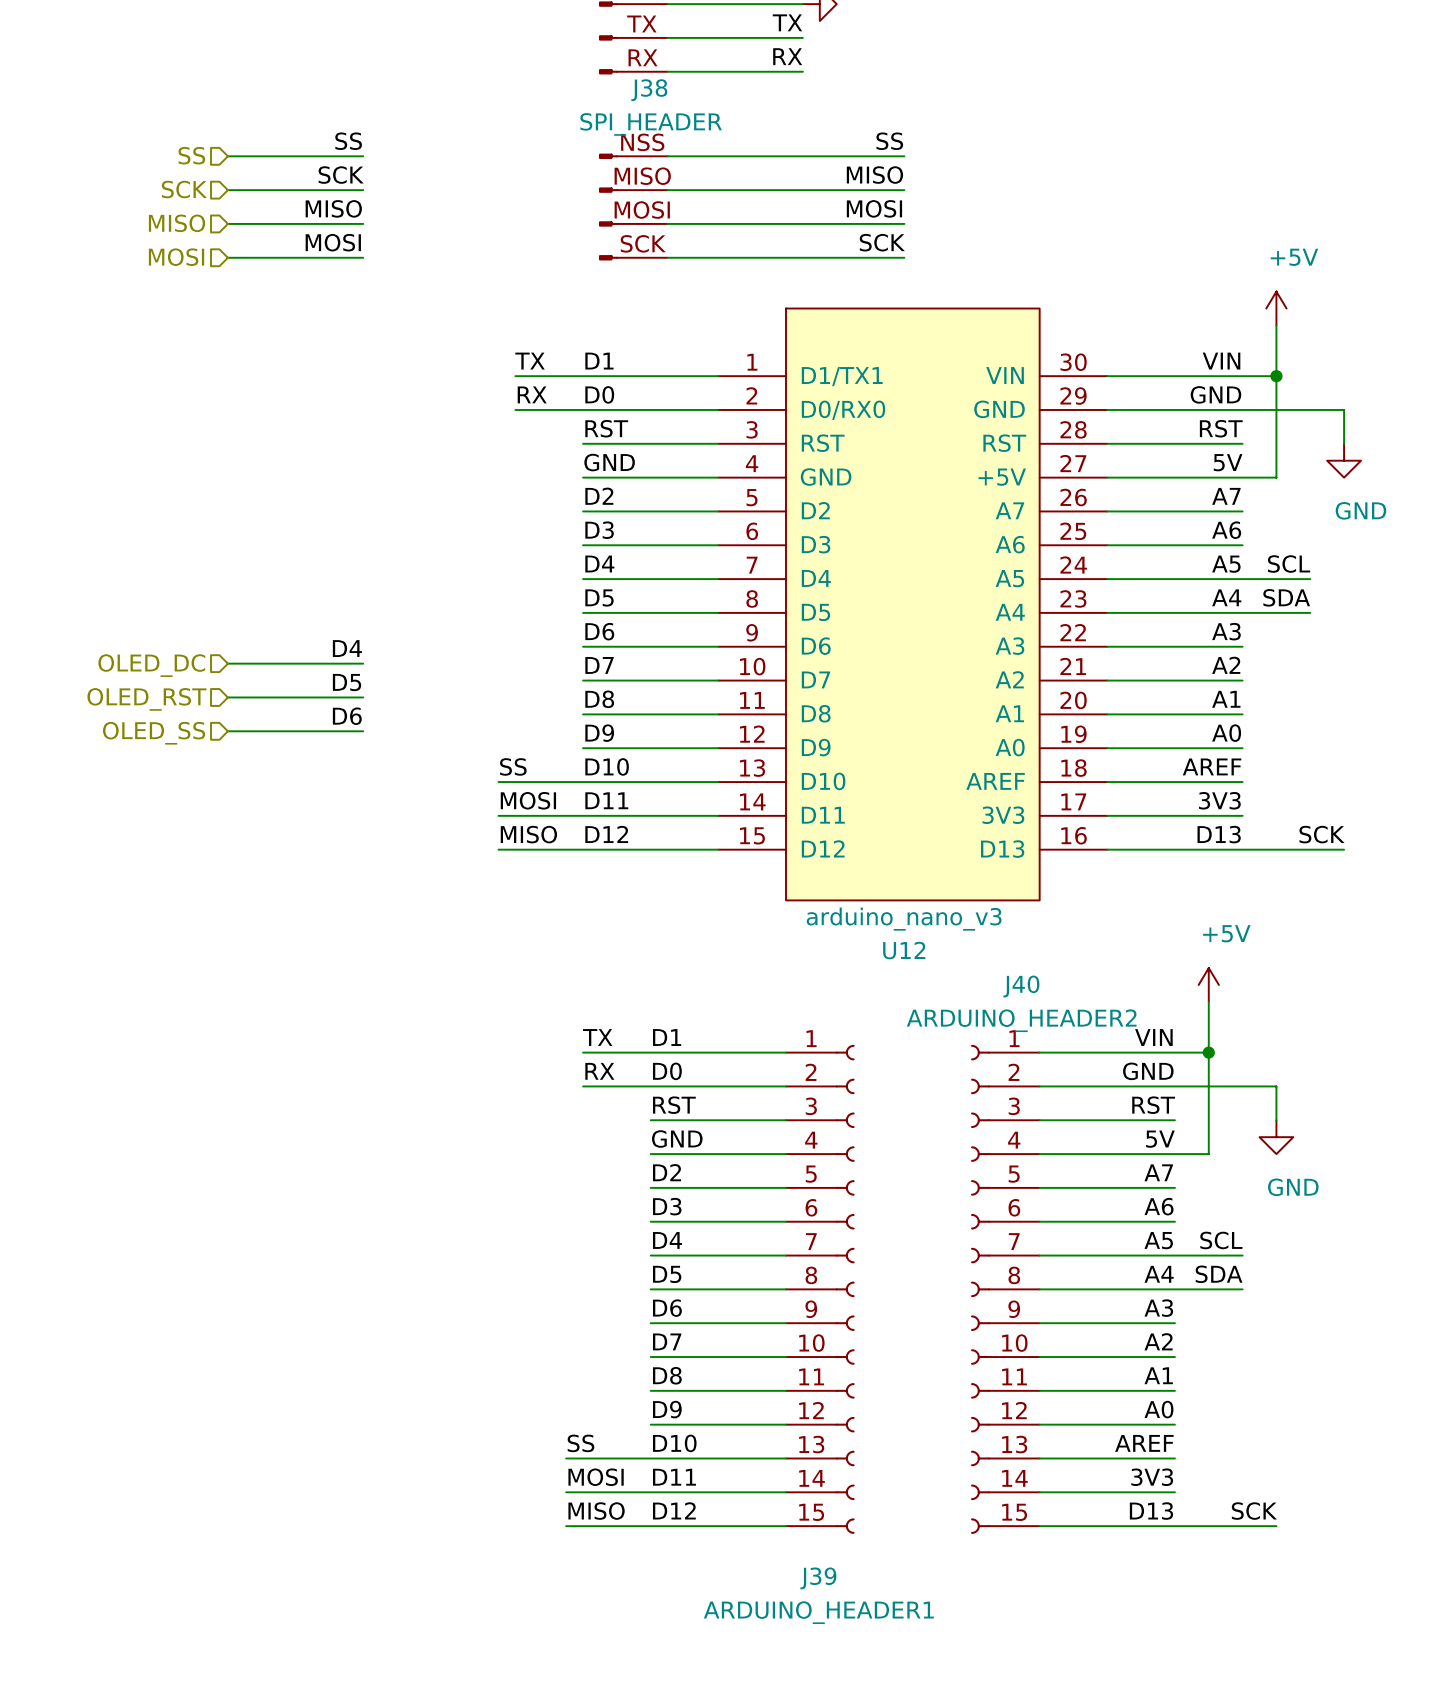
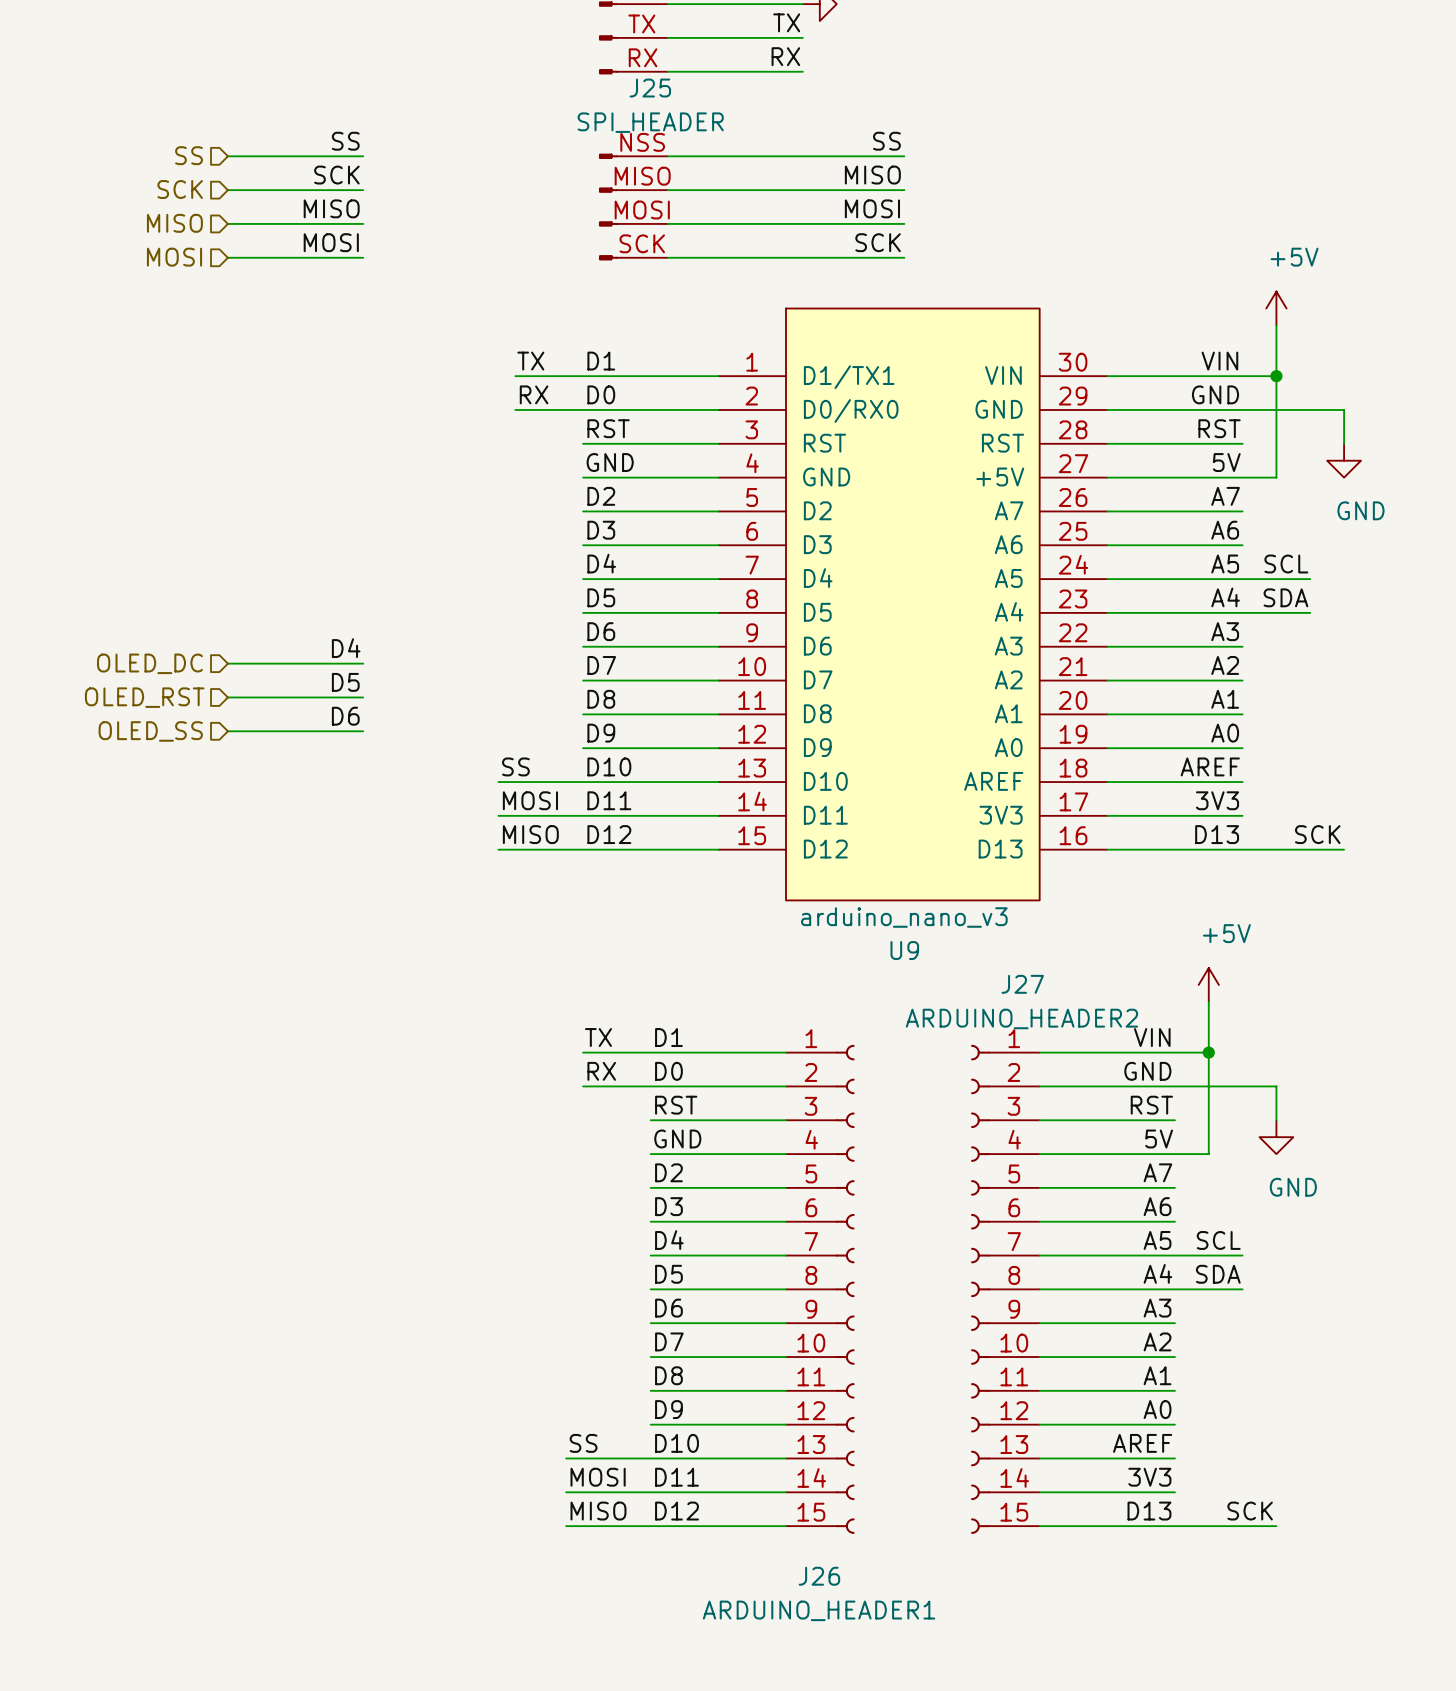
J38 name: J38 (649, 90) -> J25 (650, 88)
U12 name: U12 (904, 950) -> U9 (904, 950)
J40 name: J40 (1021, 986) -> J27 (1022, 984)
J39 name: J39 (818, 1578) -> J26 (819, 1576)

